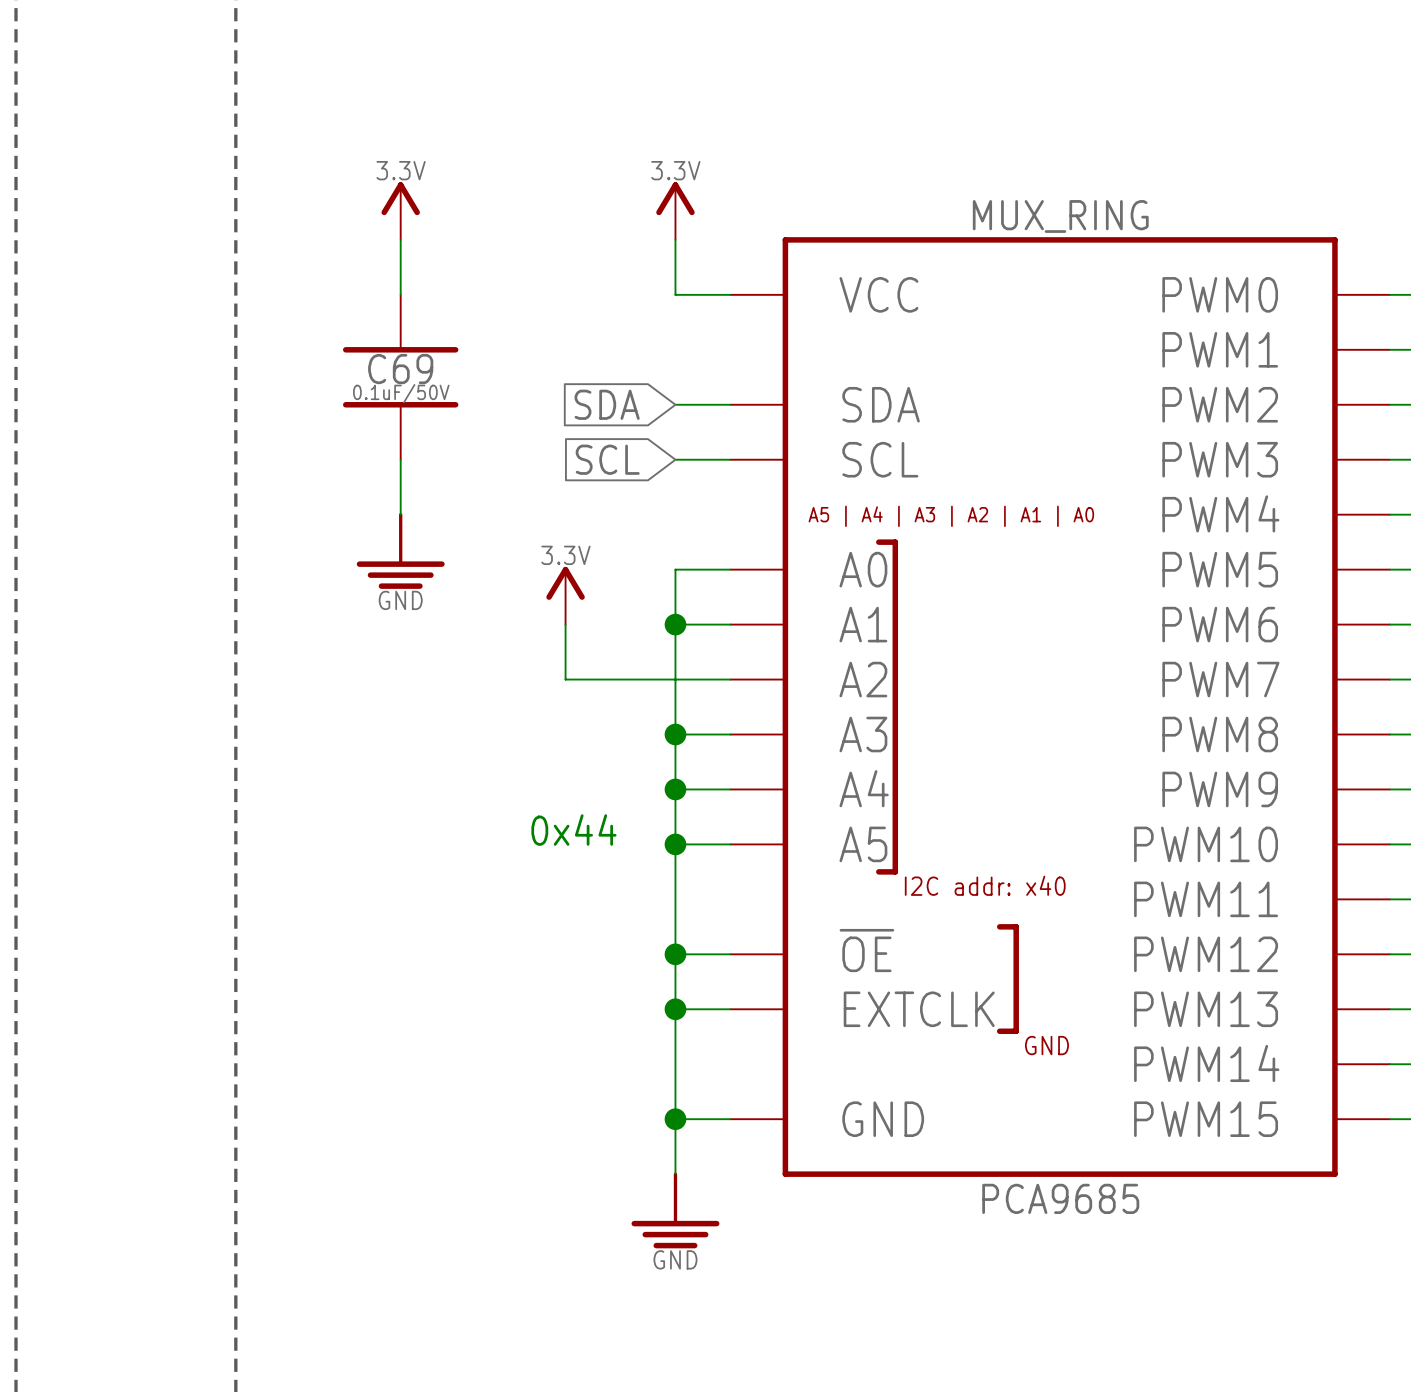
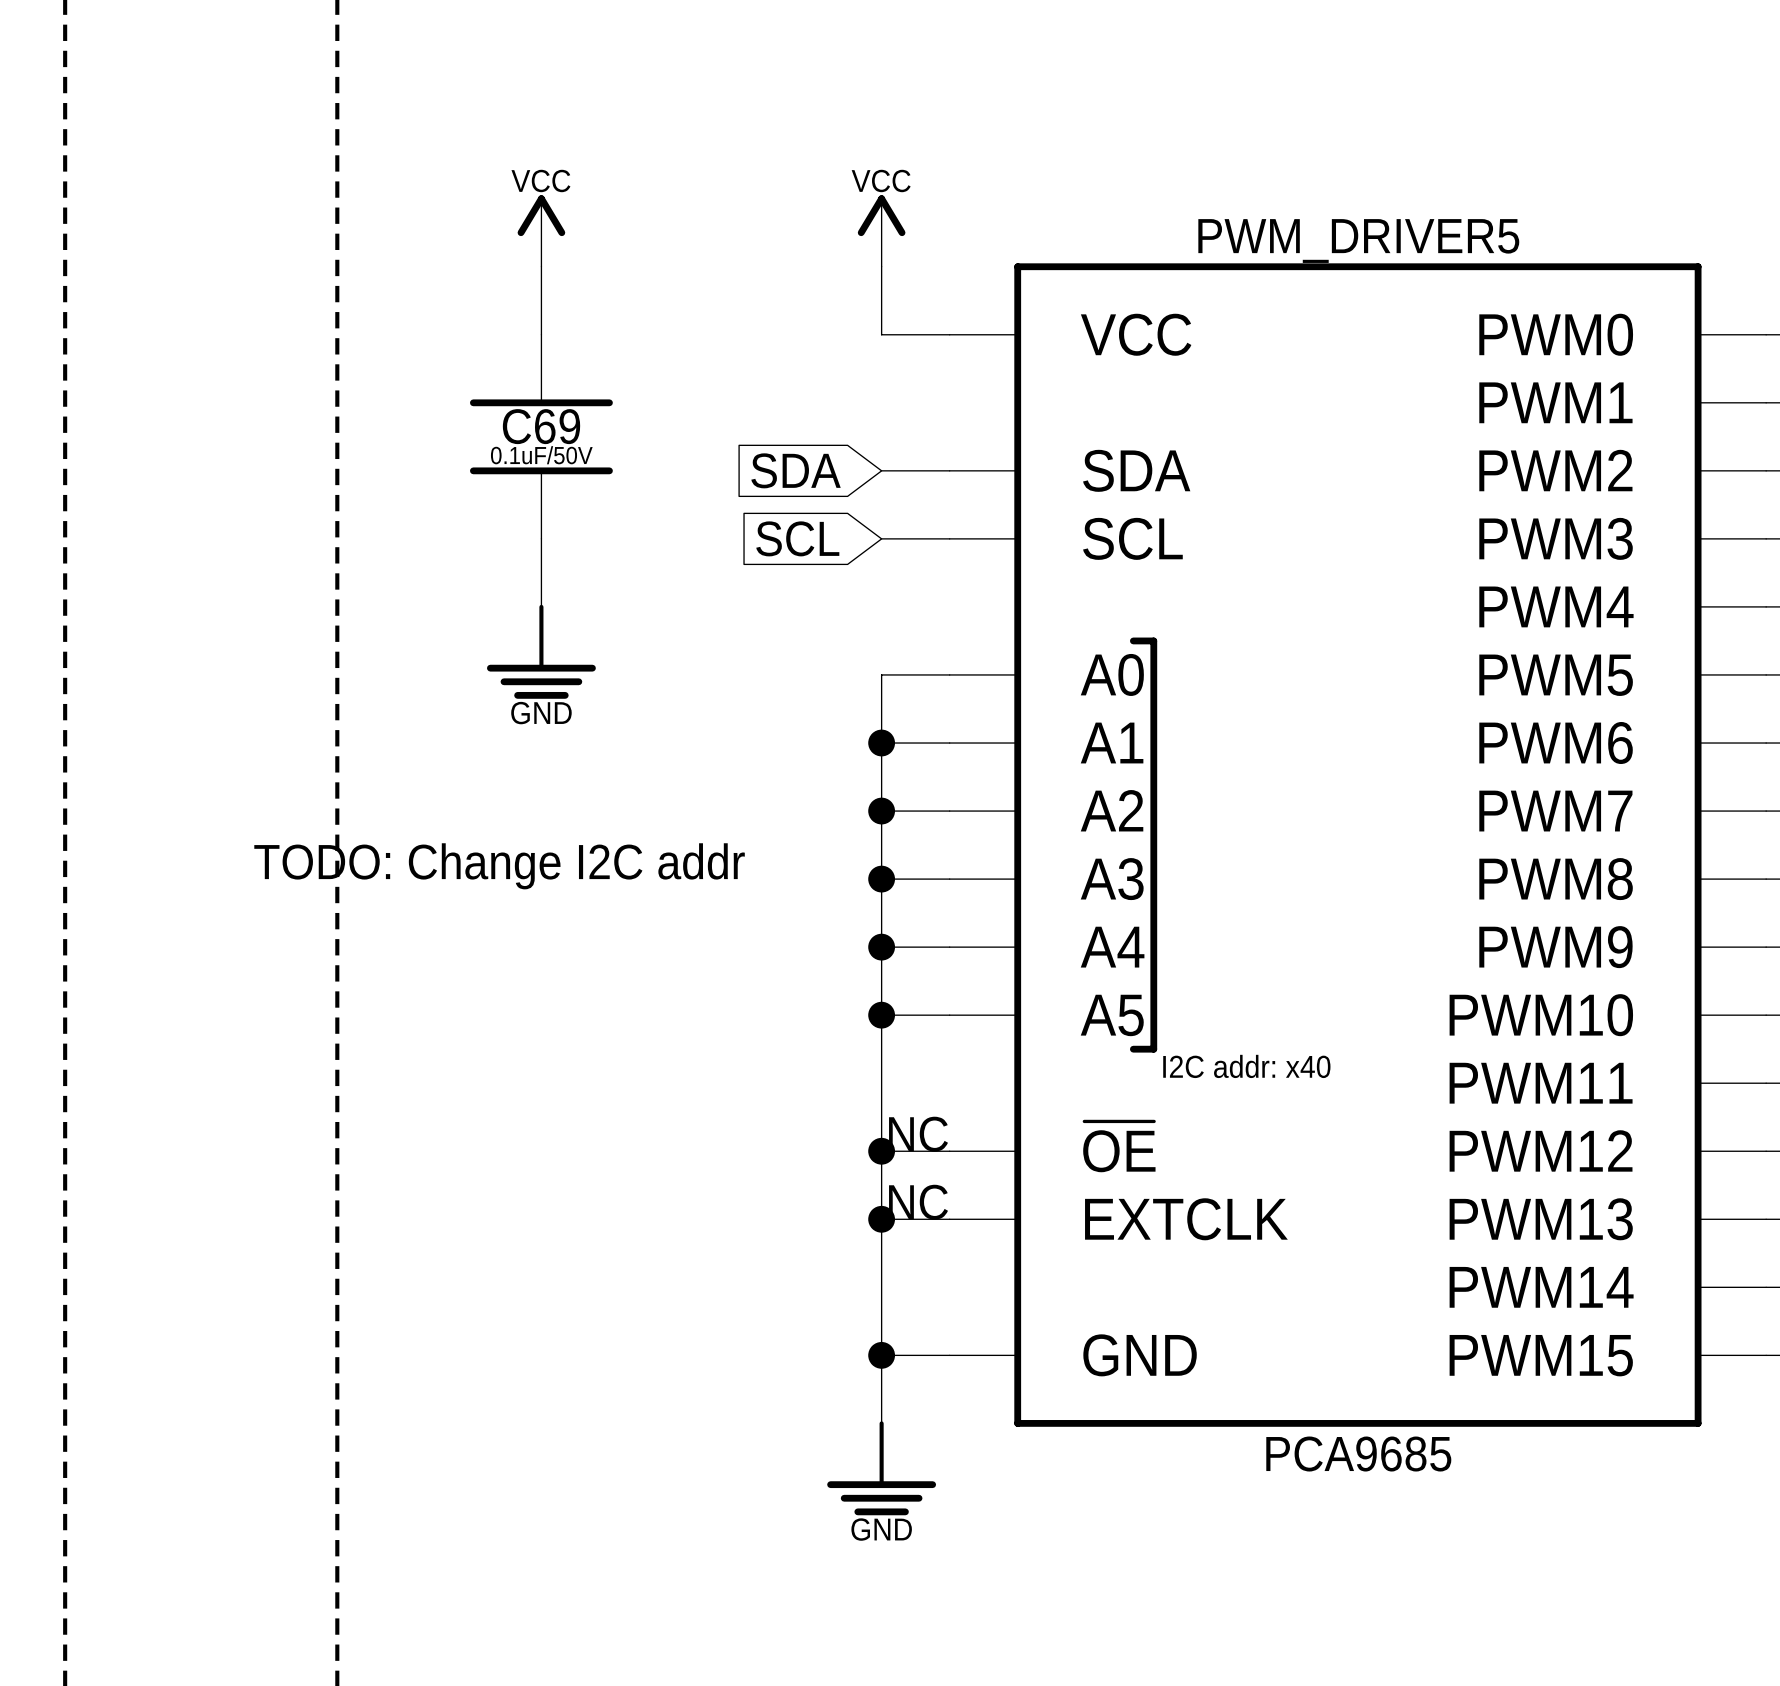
power symbol text: 3.3V (401, 170) -> VCC (540, 180)
power symbol text: 3.3V (675, 170) -> VCC (881, 180)
power symbol: (565, 595) -> none
wire: (565, 624) (565, 679) (675, 679) -> none
junction: none -> (881, 811)
MUX_RING: PCA9685 (1060, 707) -> none
PWM_DRIVER5: none -> PCA9685 (1357, 845)
text: none -> TODO: Change I2C addr (499, 866)
text: 0x44 (573, 830) -> none

